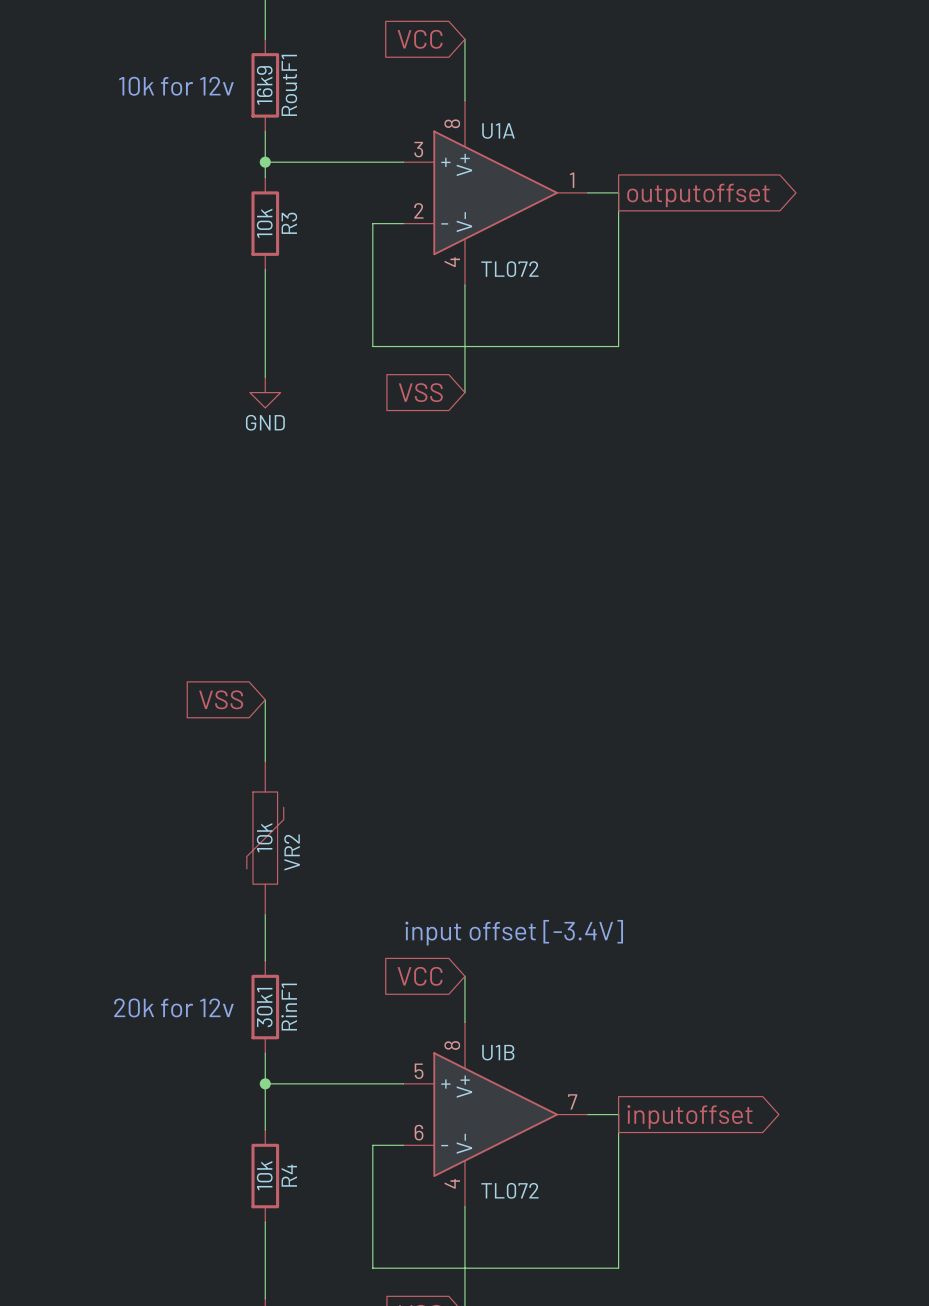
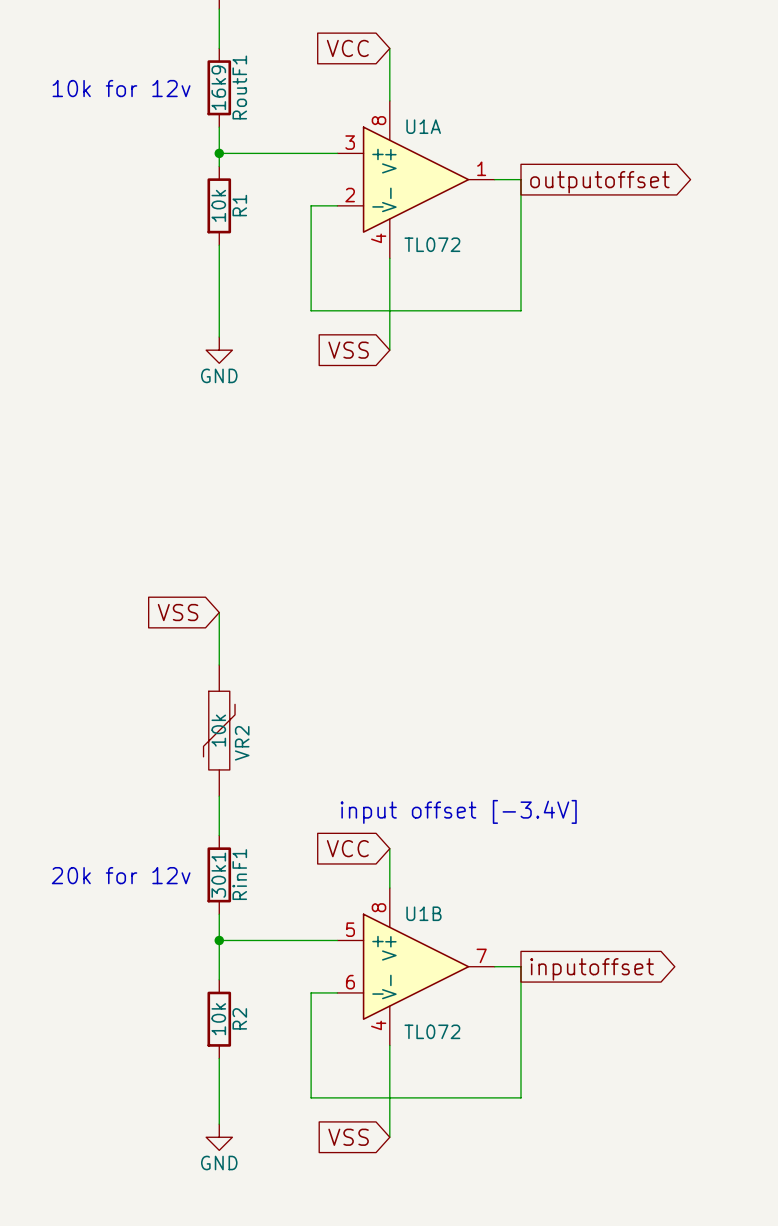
R3 name: R3 (289, 223) -> R1 (239, 205)
R4 name: R4 (289, 1175) -> R2 (239, 1018)

